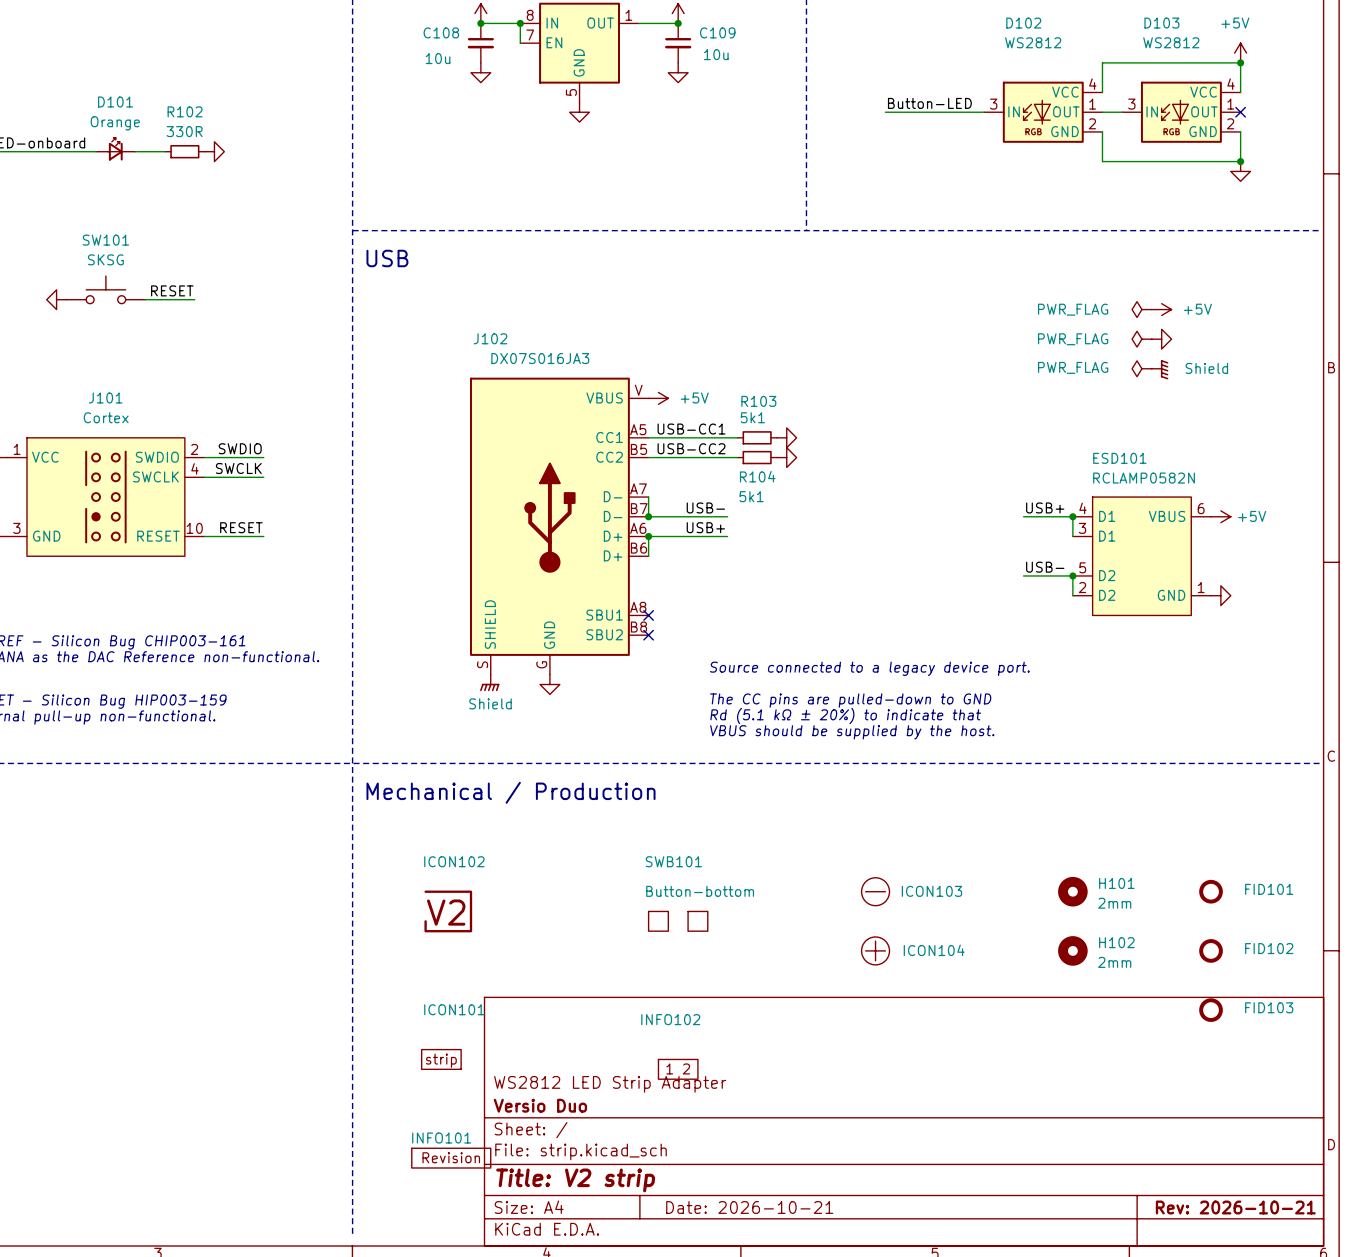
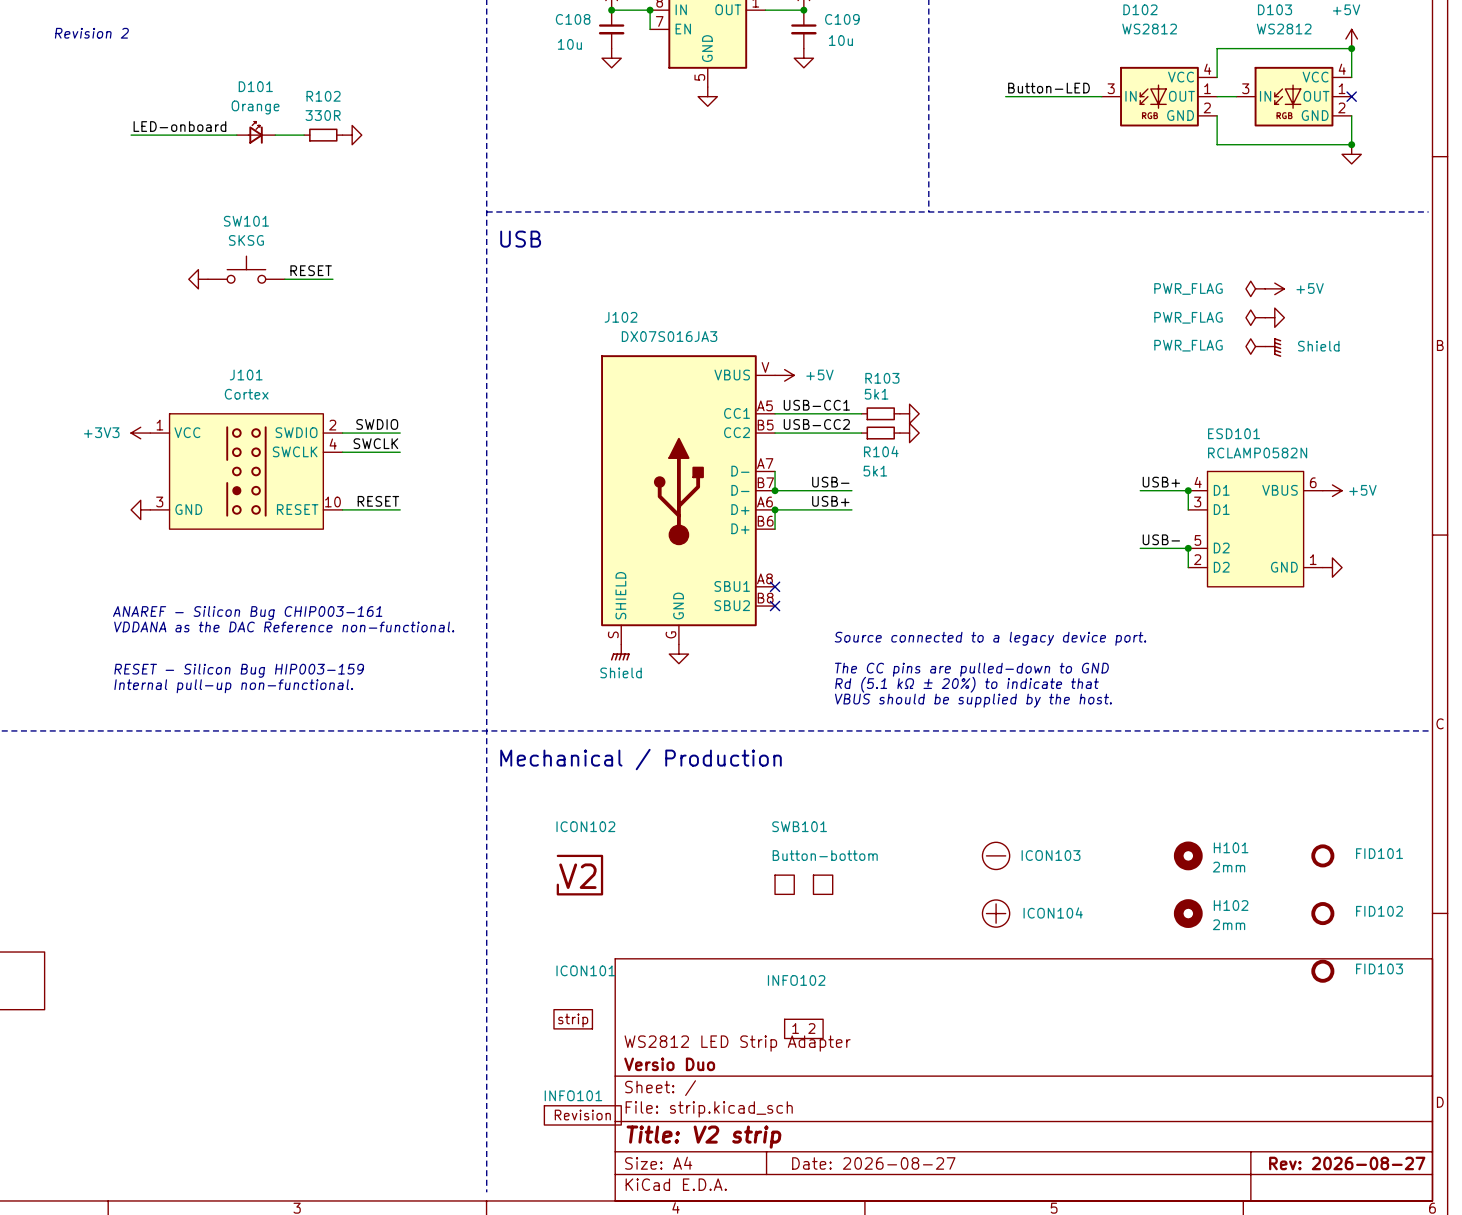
title block: Date: 2026-10-21 (749, 1207) -> Date: 2026-08-27 (873, 1163)
title block: Rev: 2026-10-21 (1235, 1207) -> Rev: 2026-08-27 (1347, 1163)

